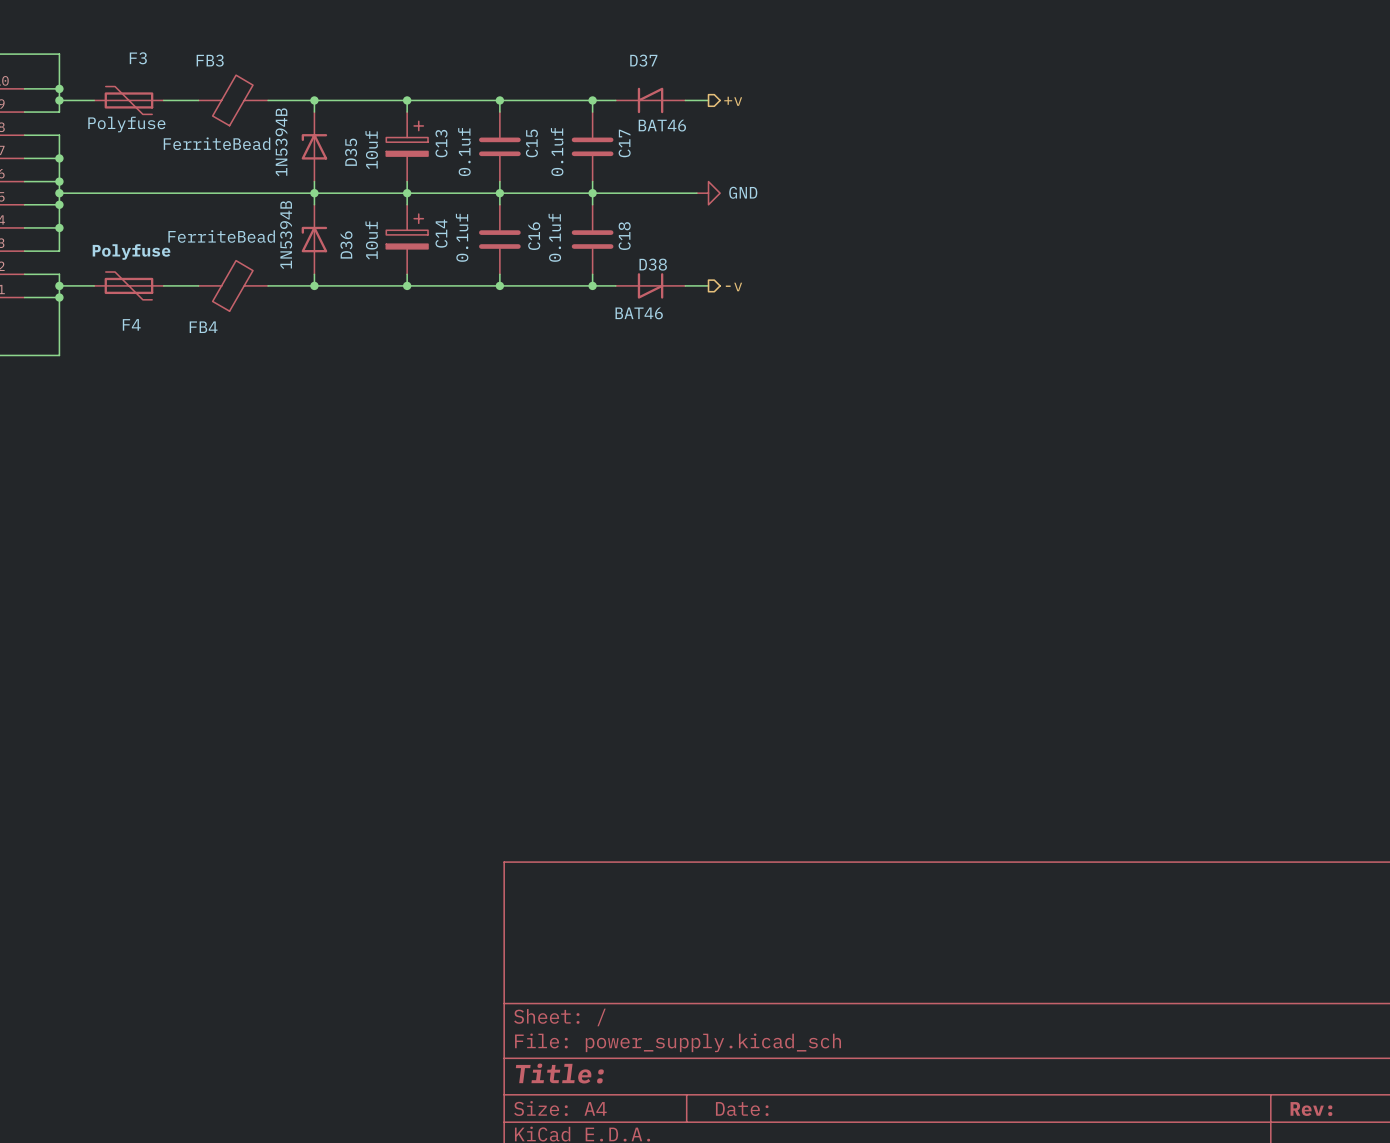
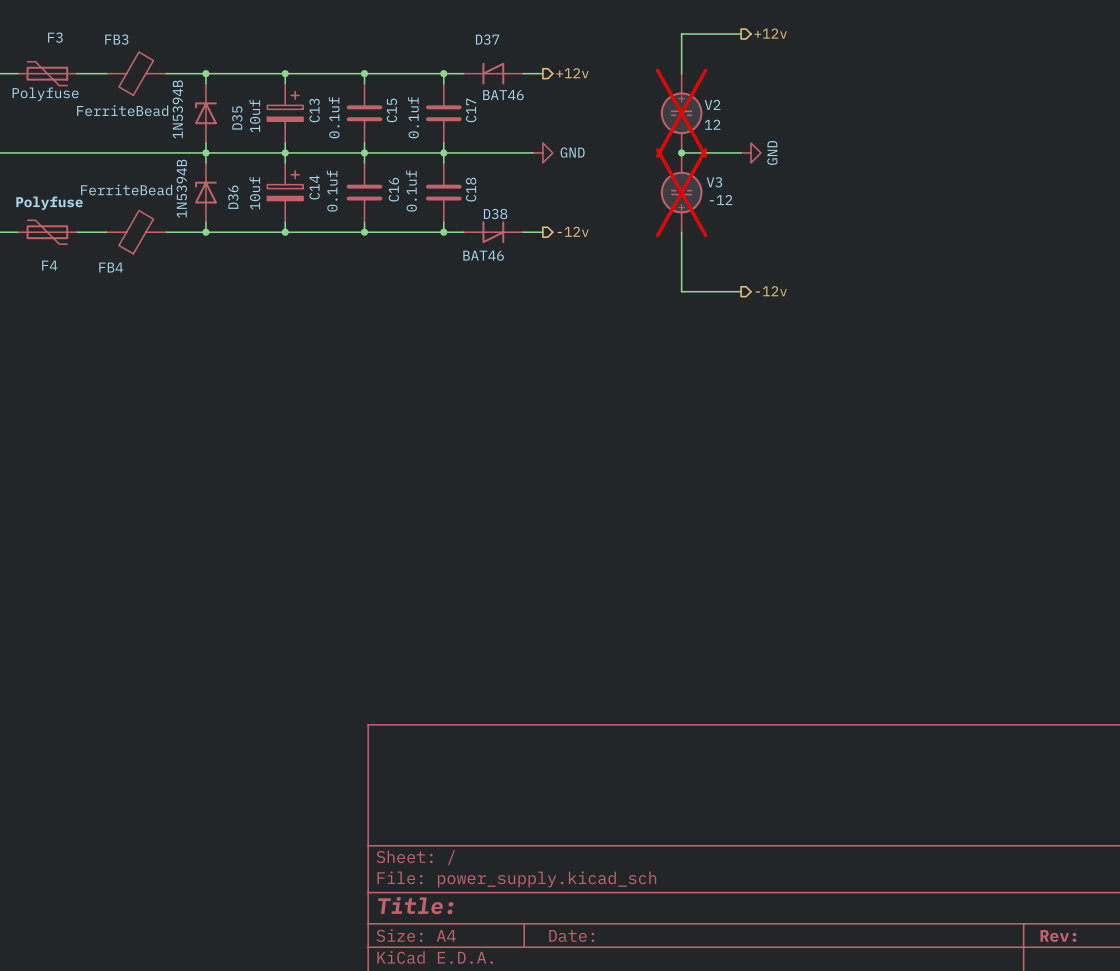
hierarchical label: none -> +12v (770, 33)
wire: none -> (741, 34) (681, 34) (681, 73)
hierarchical label: +v (733, 101) -> +12v (572, 73)
V2: none -> 12 (681, 113)
wire: none -> (681, 152) (741, 152)
junction: none -> (681, 152)
power symbol: none -> GND (751, 152)
V3: none -> -12 (681, 192)
wire: none -> (681, 232) (681, 291) (741, 291)
hierarchical label: -v (733, 286) -> -12v (573, 231)
hierarchical label: none -> -12v (771, 291)

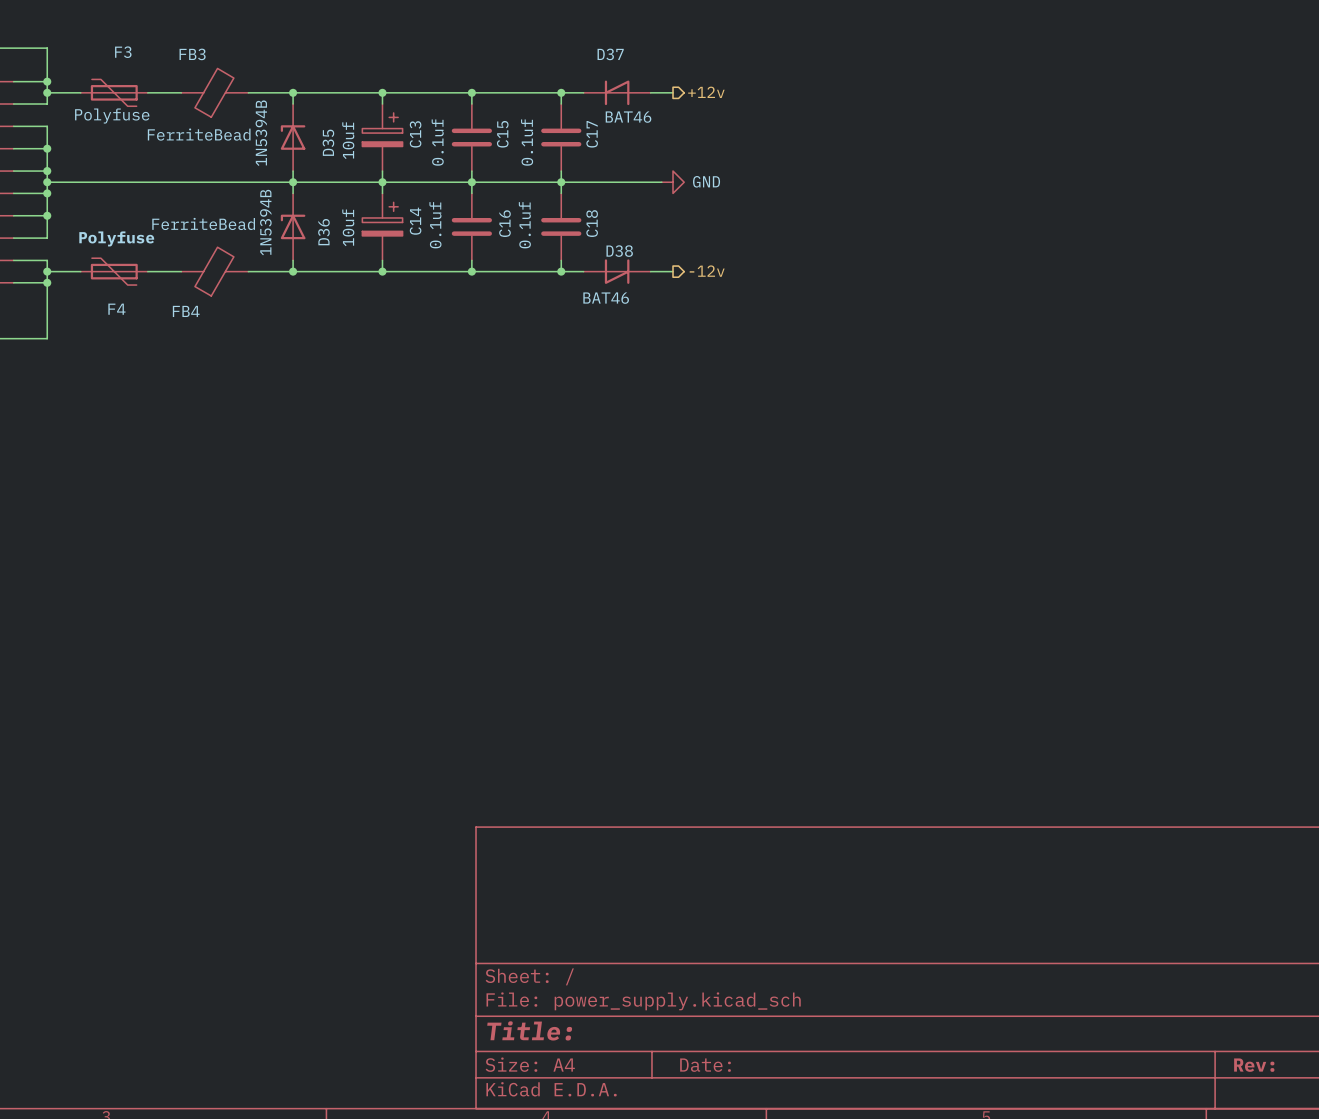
hierarchical label: +12v (770, 33) -> none
wire: (741, 34) (681, 34) (681, 73) -> none
V2: 12 (681, 113) -> none
wire: (681, 152) (741, 152) -> none
junction: (681, 152) -> none
power symbol: GND (751, 152) -> none
V3: -12 (681, 192) -> none
wire: (681, 232) (681, 291) (741, 291) -> none
hierarchical label: -12v (771, 291) -> none

